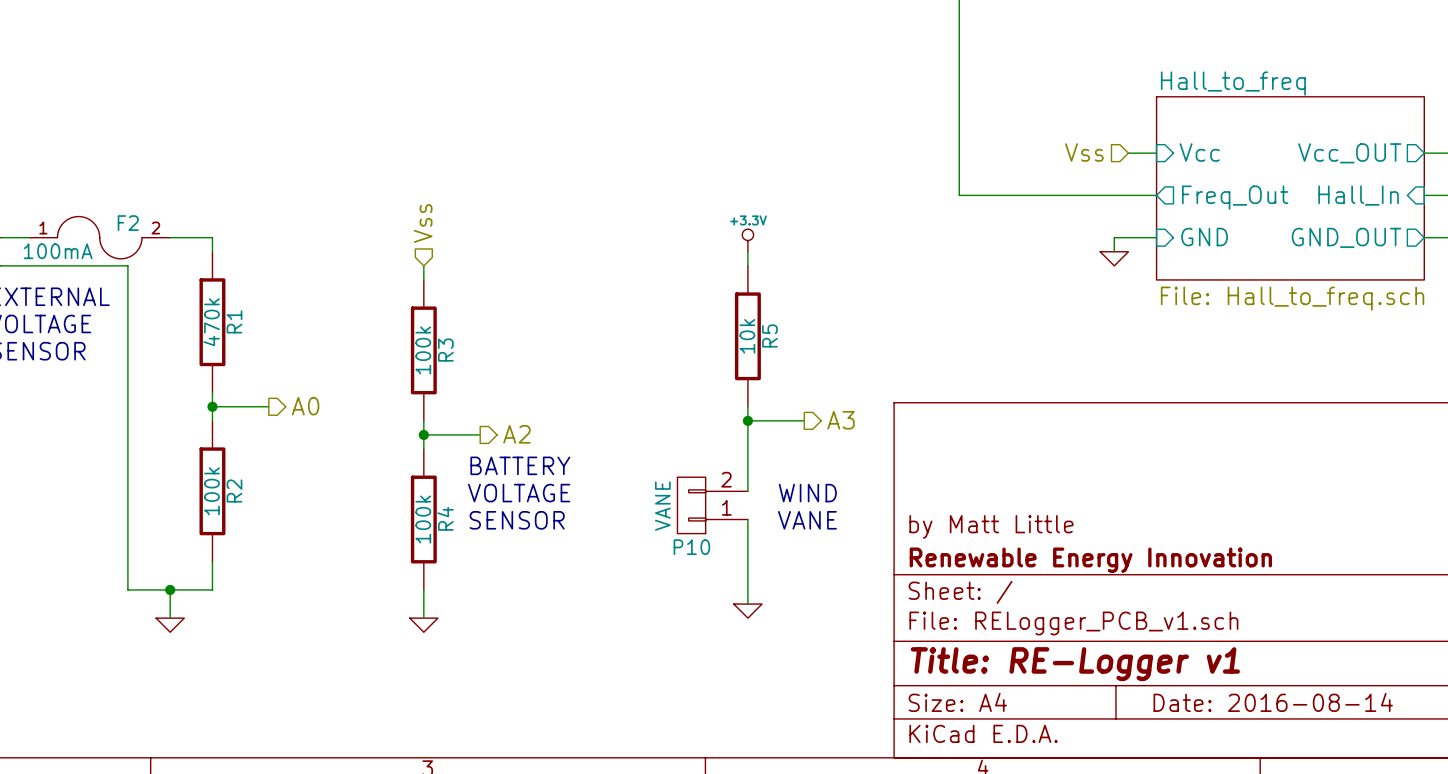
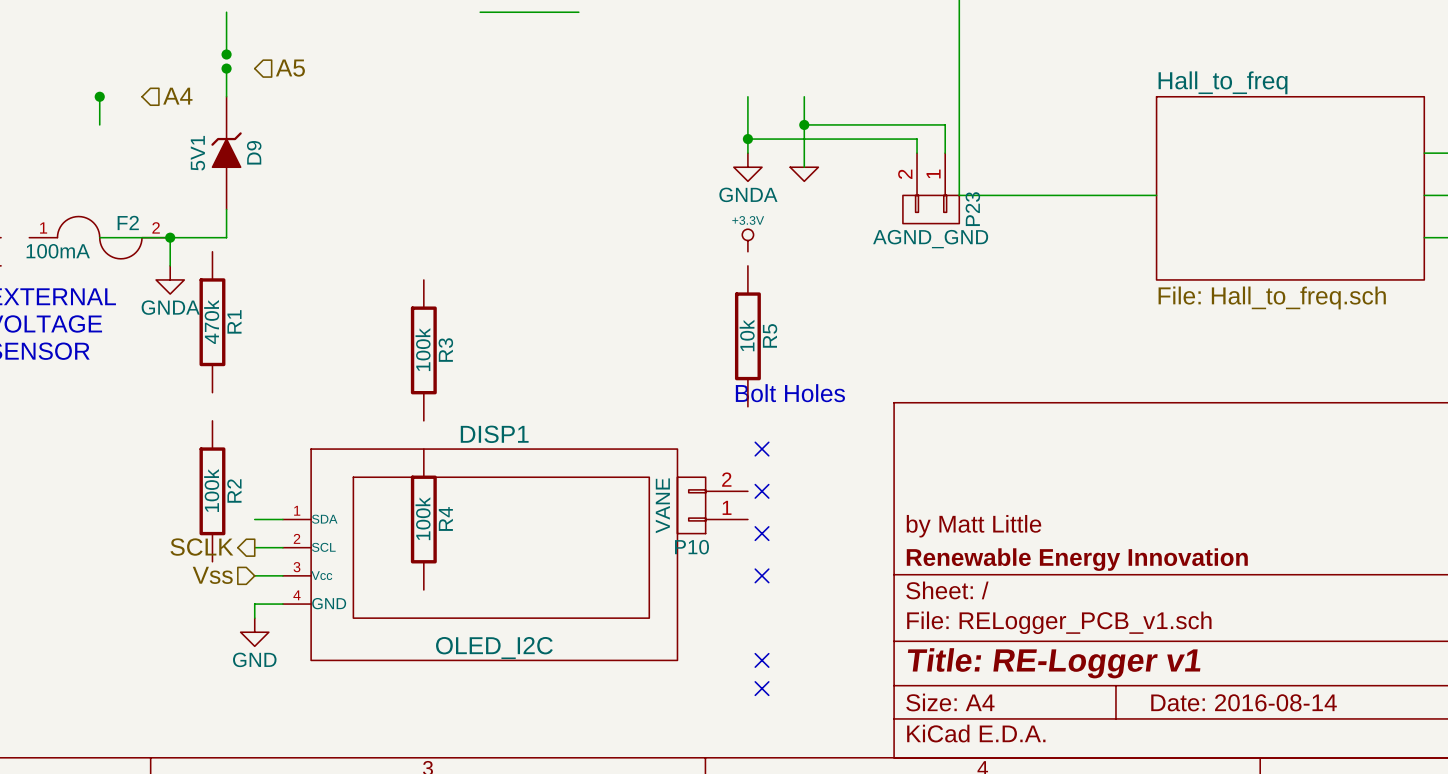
wire: none -> (226, 12) (226, 54)
wire: none -> (480, 12) (578, 12)
junction: none -> (226, 54)
hierarchical label: none -> A5 (290, 68)
wire: none -> (226, 68) (226, 96)
junction: none -> (226, 68)
hierarchical label: none -> A4 (177, 96)
wire: none -> (99, 96) (99, 124)
junction: none -> (99, 96)
wire: none -> (747, 96) (747, 153)
wire: none -> (804, 96) (804, 167)
wire: none -> (804, 124) (945, 124) (945, 153)
junction: none -> (804, 124)
wire: none -> (747, 139) (917, 139) (917, 153)
junction: none -> (747, 139)
hierarchical label: Vss (1084, 152) -> none
sheet pin: Vcc (1199, 152) -> none
D9: none -> 5V1 (226, 153)
wire: (1128, 153) (1156, 153) -> none
sheet pin: Vcc_OUT (1349, 153) -> none
power symbol: none -> GNDA (747, 167)
power symbol: none -> (804, 174)
P23: none -> AGND_GND (931, 188)
sheet pin: Hall_In (1358, 195) -> none
sheet pin: Freq_Out (1235, 197) -> none
hierarchical label: Vss (423, 223) -> none
wire: (1, 237) (29, 237) -> none
wire: none -> (99, 237) (170, 237) (170, 265)
junction: none -> (170, 237)
wire: (212, 237) (212, 251) -> (212, 237) (226, 237) (226, 209)
wire: (1156, 237) (1114, 237) (1114, 251) -> none
sheet pin: GND (1204, 237) -> none
sheet pin: GND_OUT (1346, 237) -> none
wire: (747, 251) (747, 265) -> none
power symbol: (1114, 258) -> none
wire: (1, 265) (127, 265) (127, 589) (212, 589) (212, 561) -> none
wire: (423, 265) (423, 279) -> none
power symbol: none -> GNDA (170, 279)
wire: (212, 392) (212, 420) -> none
text: none -> Bolt Holes (790, 393)
wire: (212, 406) (268, 406) -> none
junction: (212, 406) -> none
hierarchical label: A0 (305, 406) -> none
wire: (747, 406) (747, 491) -> none
wire: (423, 420) (423, 449) -> none
wire: (747, 420) (804, 420) -> none
junction: (747, 420) -> none
hierarchical label: A3 (841, 420) -> none
wire: (423, 434) (480, 434) -> none
junction: (423, 434) -> none
hierarchical label: A2 (516, 434) -> none
no-connect mark: none -> (762, 449)
text: BATTERY (520, 465) -> none
no-connect mark: none -> (762, 491)
text: VOLTAGE (519, 493) -> none
text: WIND (807, 493) -> none
wire: none -> (254, 519) (282, 519)
wire: (747, 519) (747, 604) -> none
text: SENSOR (517, 520) -> none
text: VANE (807, 520) -> none
no-connect mark: none -> (762, 533)
hierarchical label: none -> SCLK (201, 547)
wire: none -> (254, 547) (282, 547)
DISP1: none -> OLED_I2C (480, 554)
hierarchical label: none -> Vss (212, 575)
wire: none -> (254, 575) (282, 575)
no-connect mark: none -> (762, 575)
wire: (170, 589) (170, 618) -> none
junction: (170, 589) -> none
wire: (423, 589) (423, 618) -> none
wire: none -> (282, 604) (254, 604) (254, 618)
power symbol: (747, 611) -> none
power symbol: (170, 625) -> none
power symbol: (423, 625) -> none
power symbol: none -> GND (254, 632)
no-connect mark: none -> (762, 660)
no-connect mark: none -> (762, 688)

